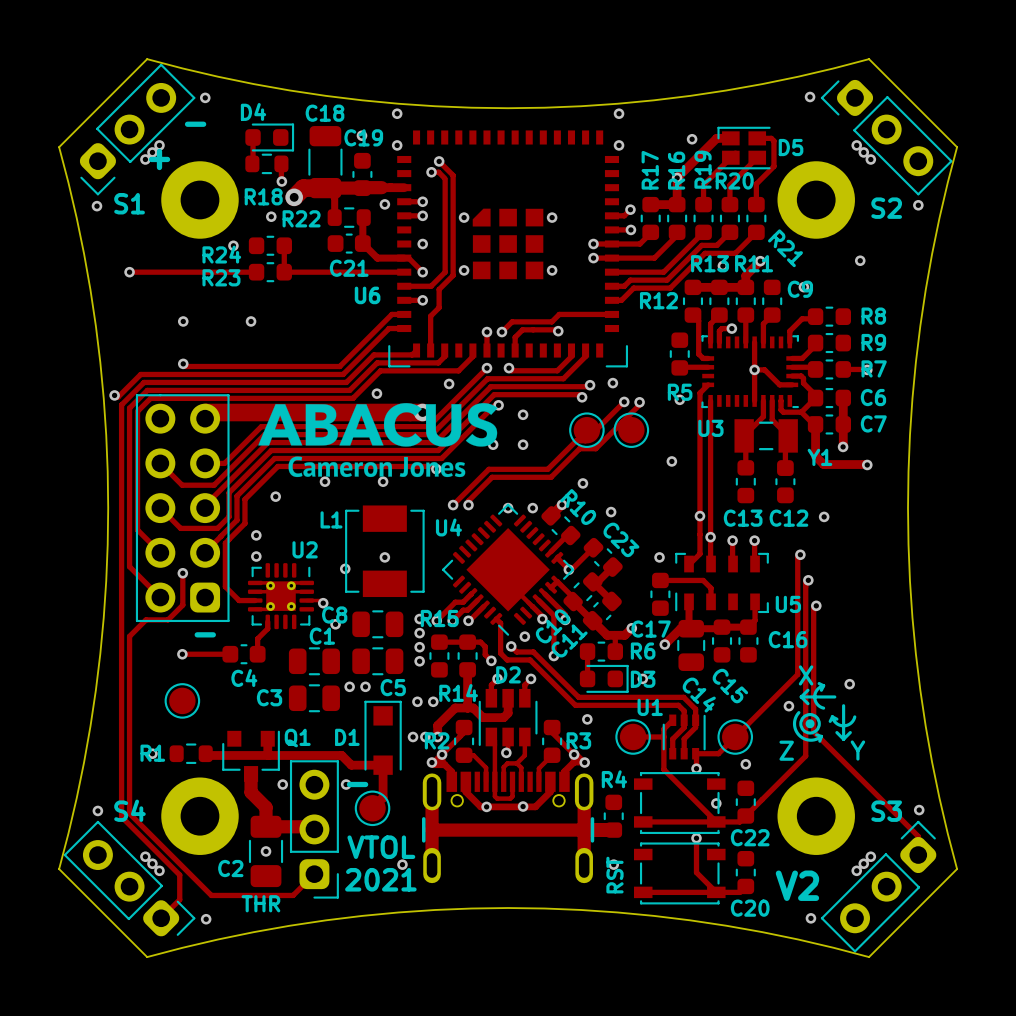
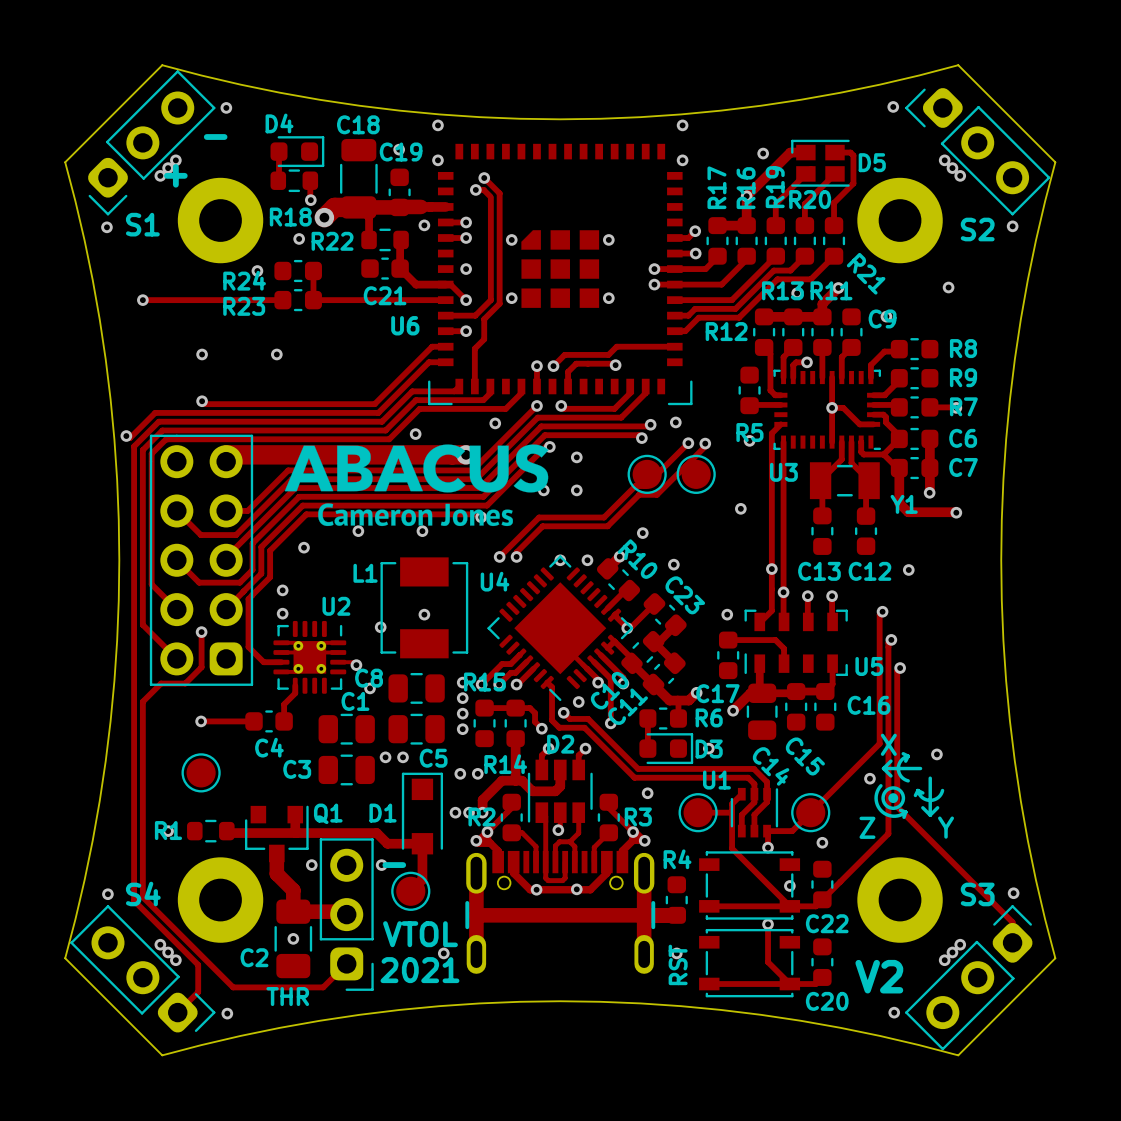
text: - (205, 634) -> none

